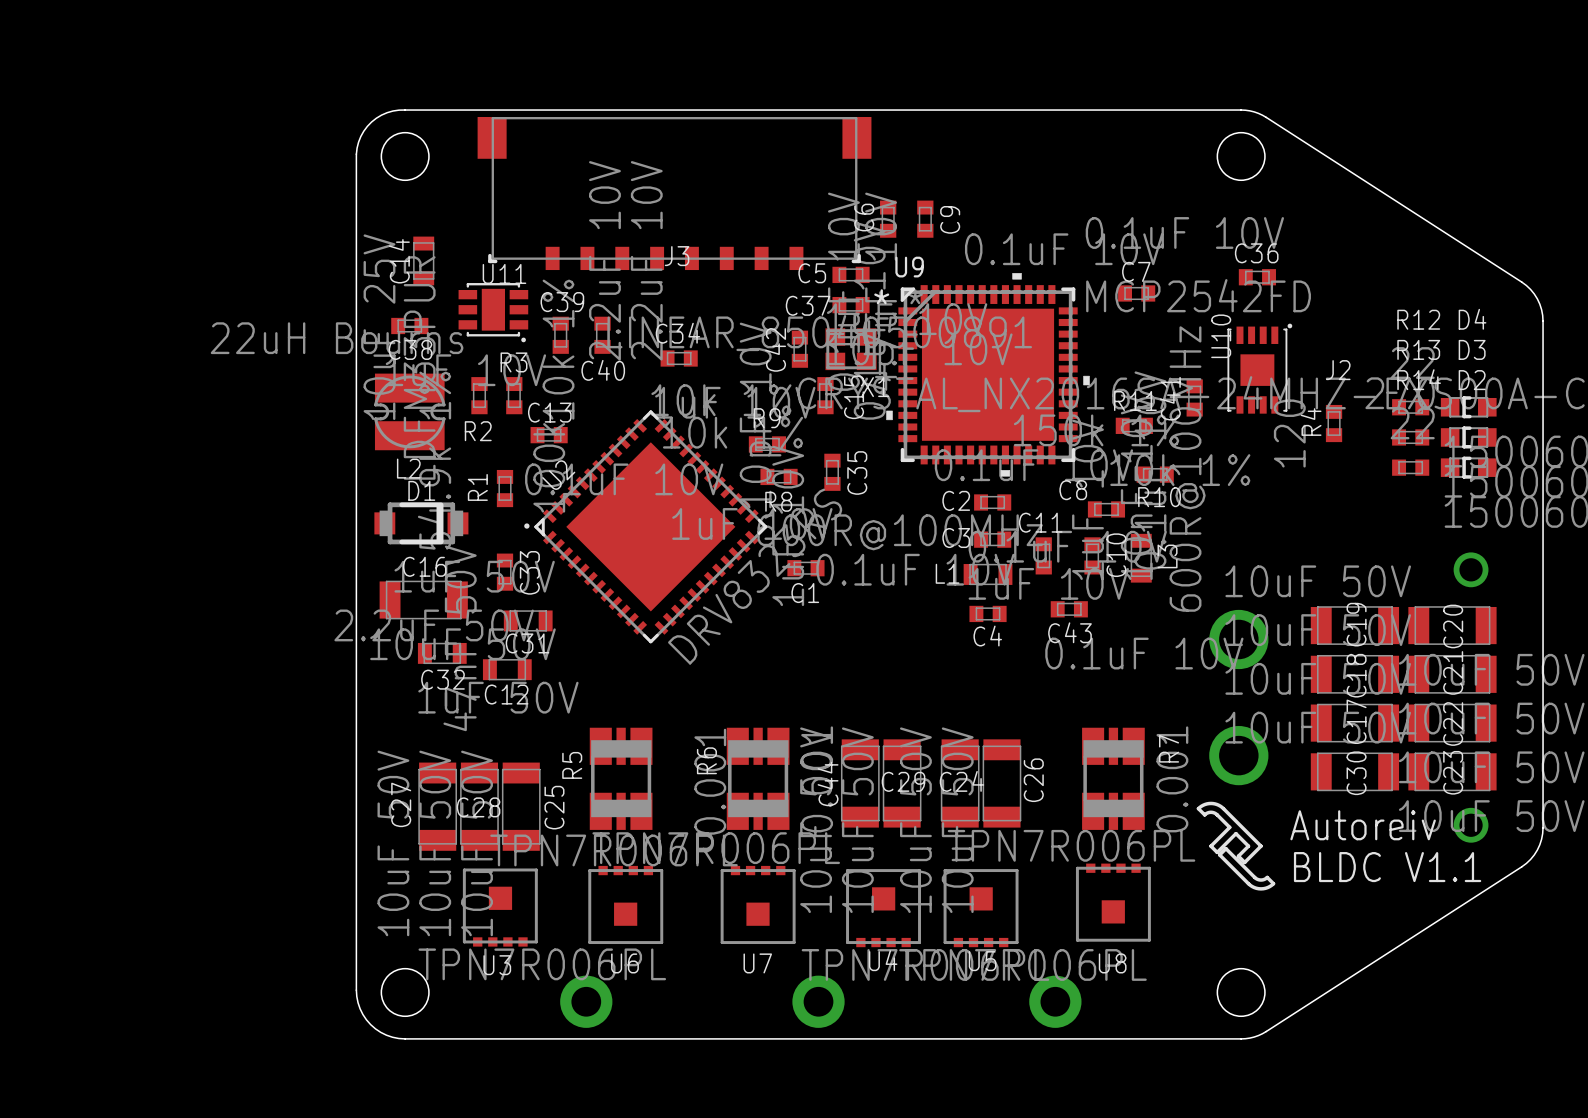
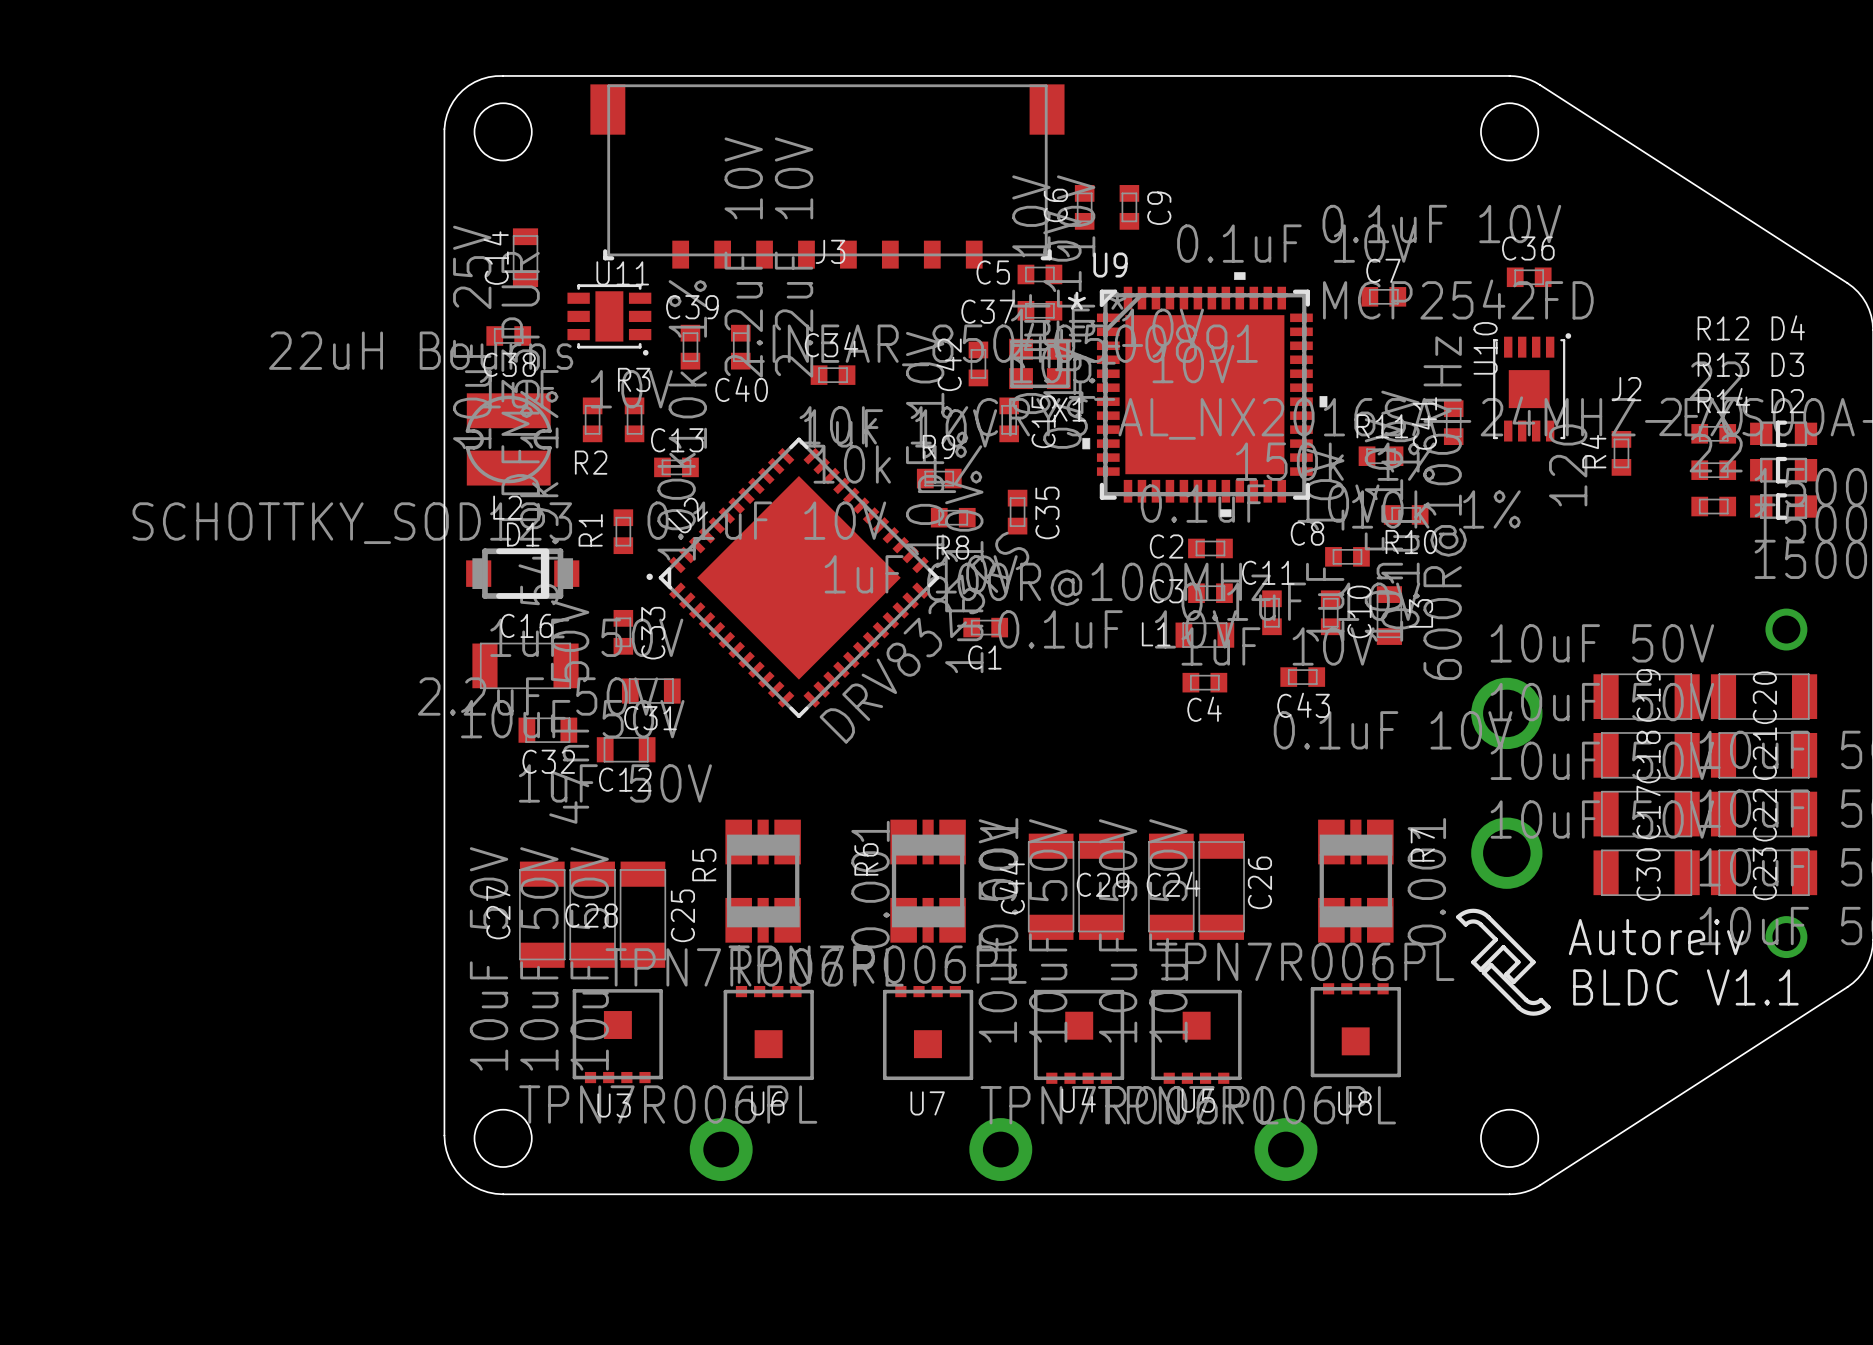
D1 value: none -> SCHOTTKY_SOD123 (352, 523)

